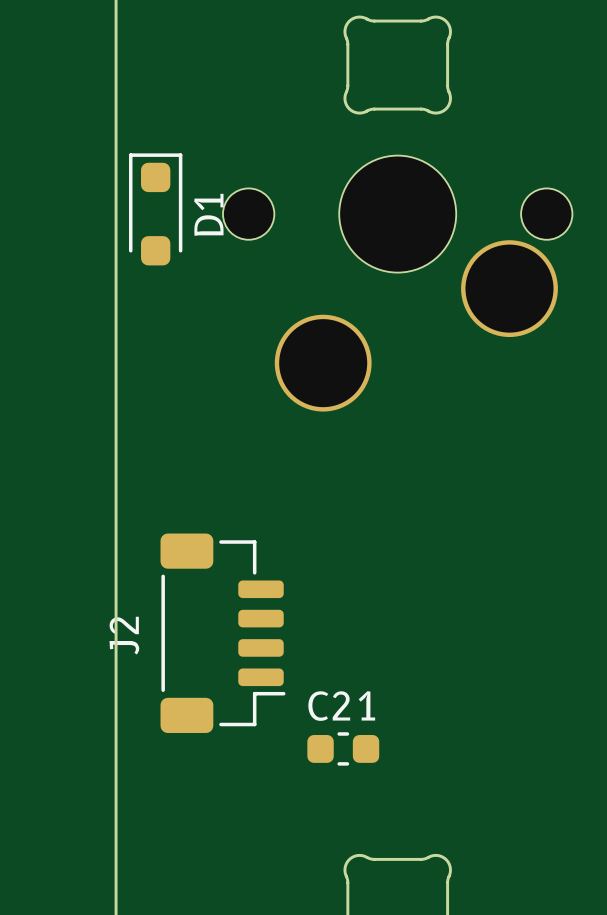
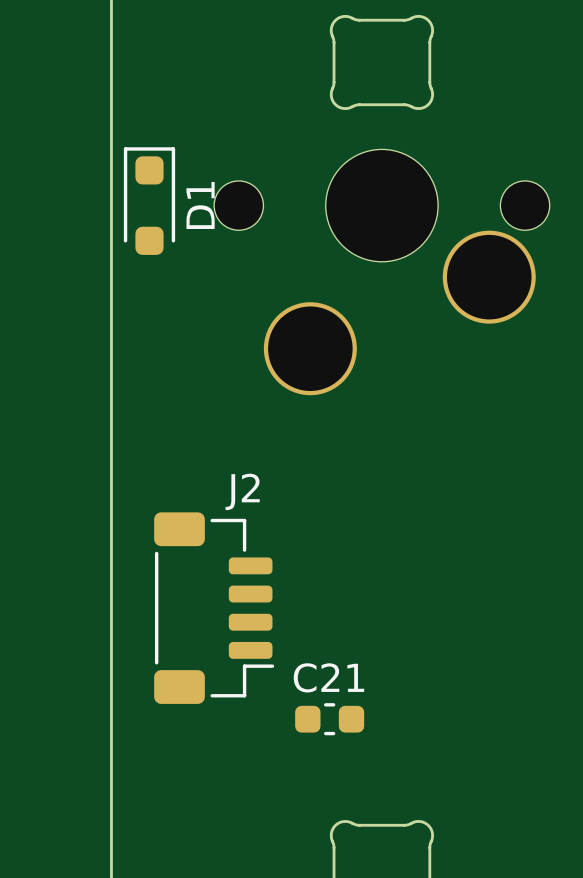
J2 name rotation: 0° (124, 635) -> 90° clockwise (242, 491)
J2 name position: J2 (124, 635) -> J2 (242, 491)

